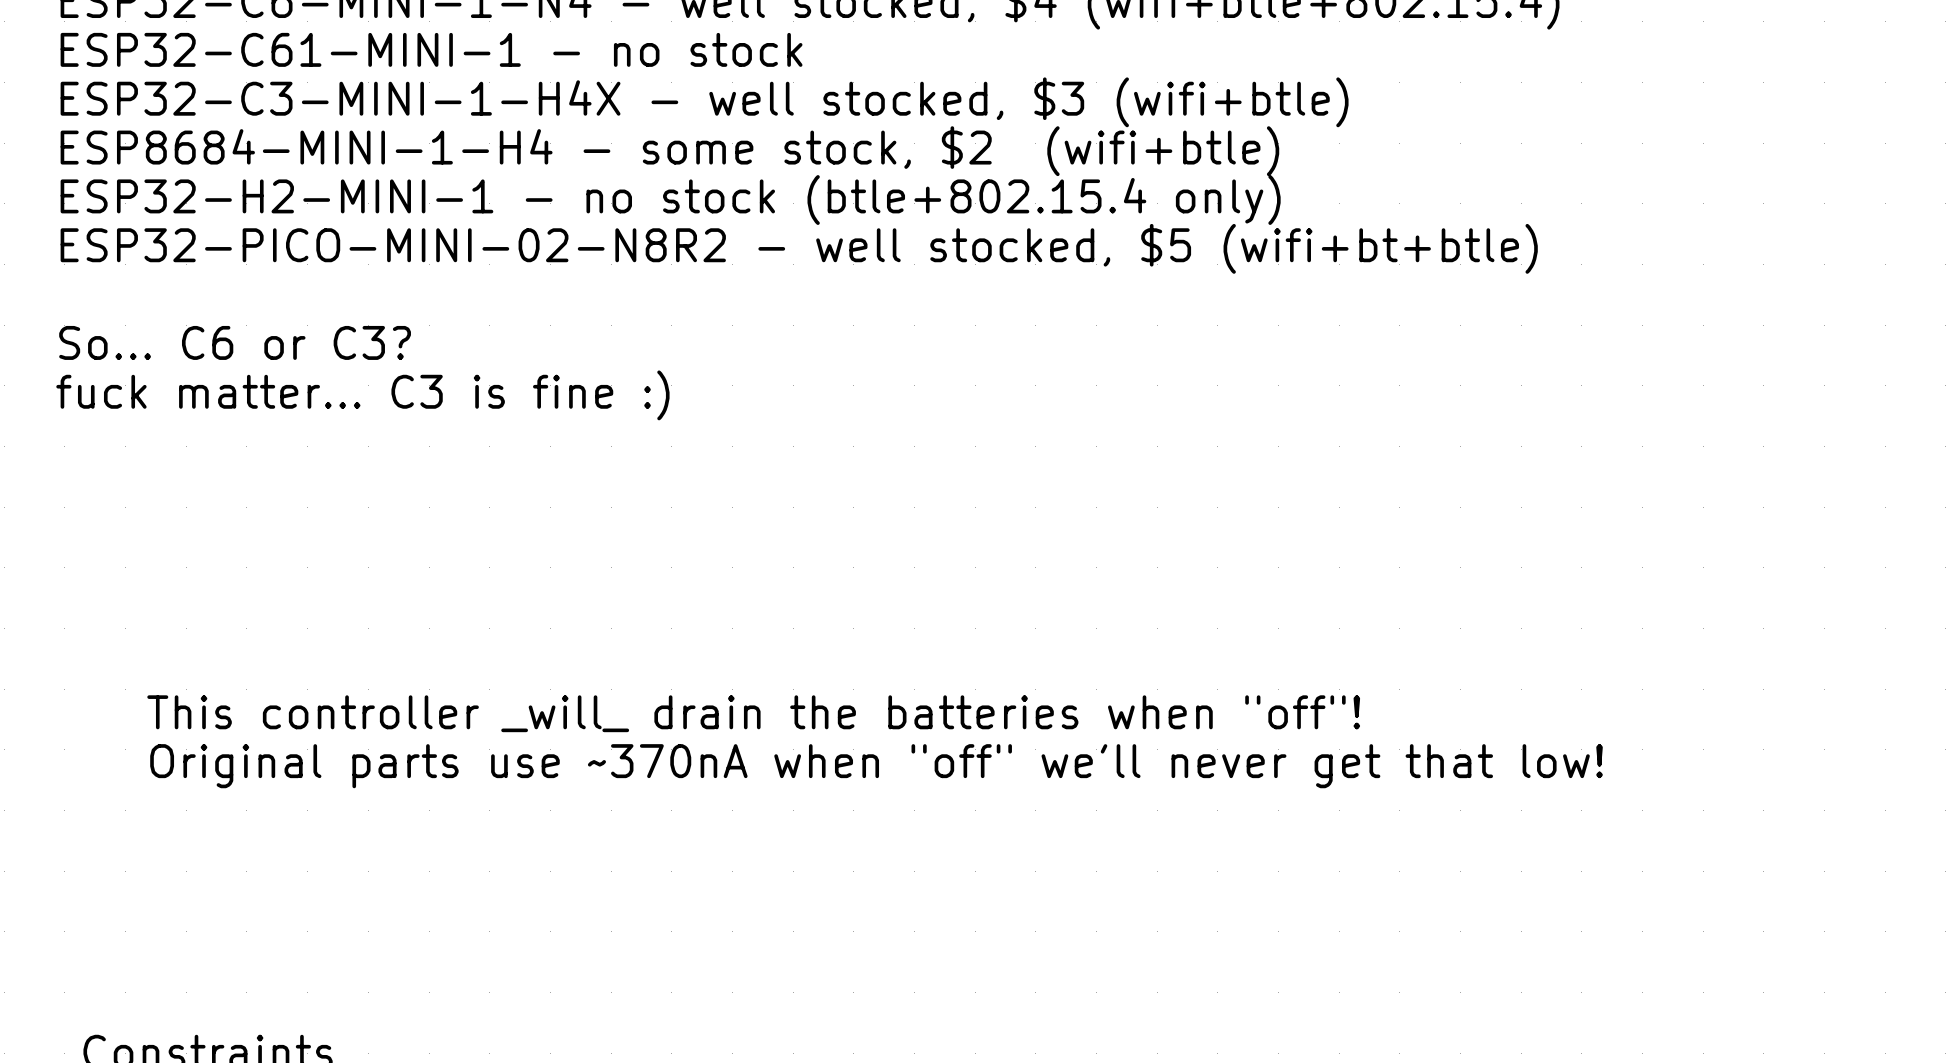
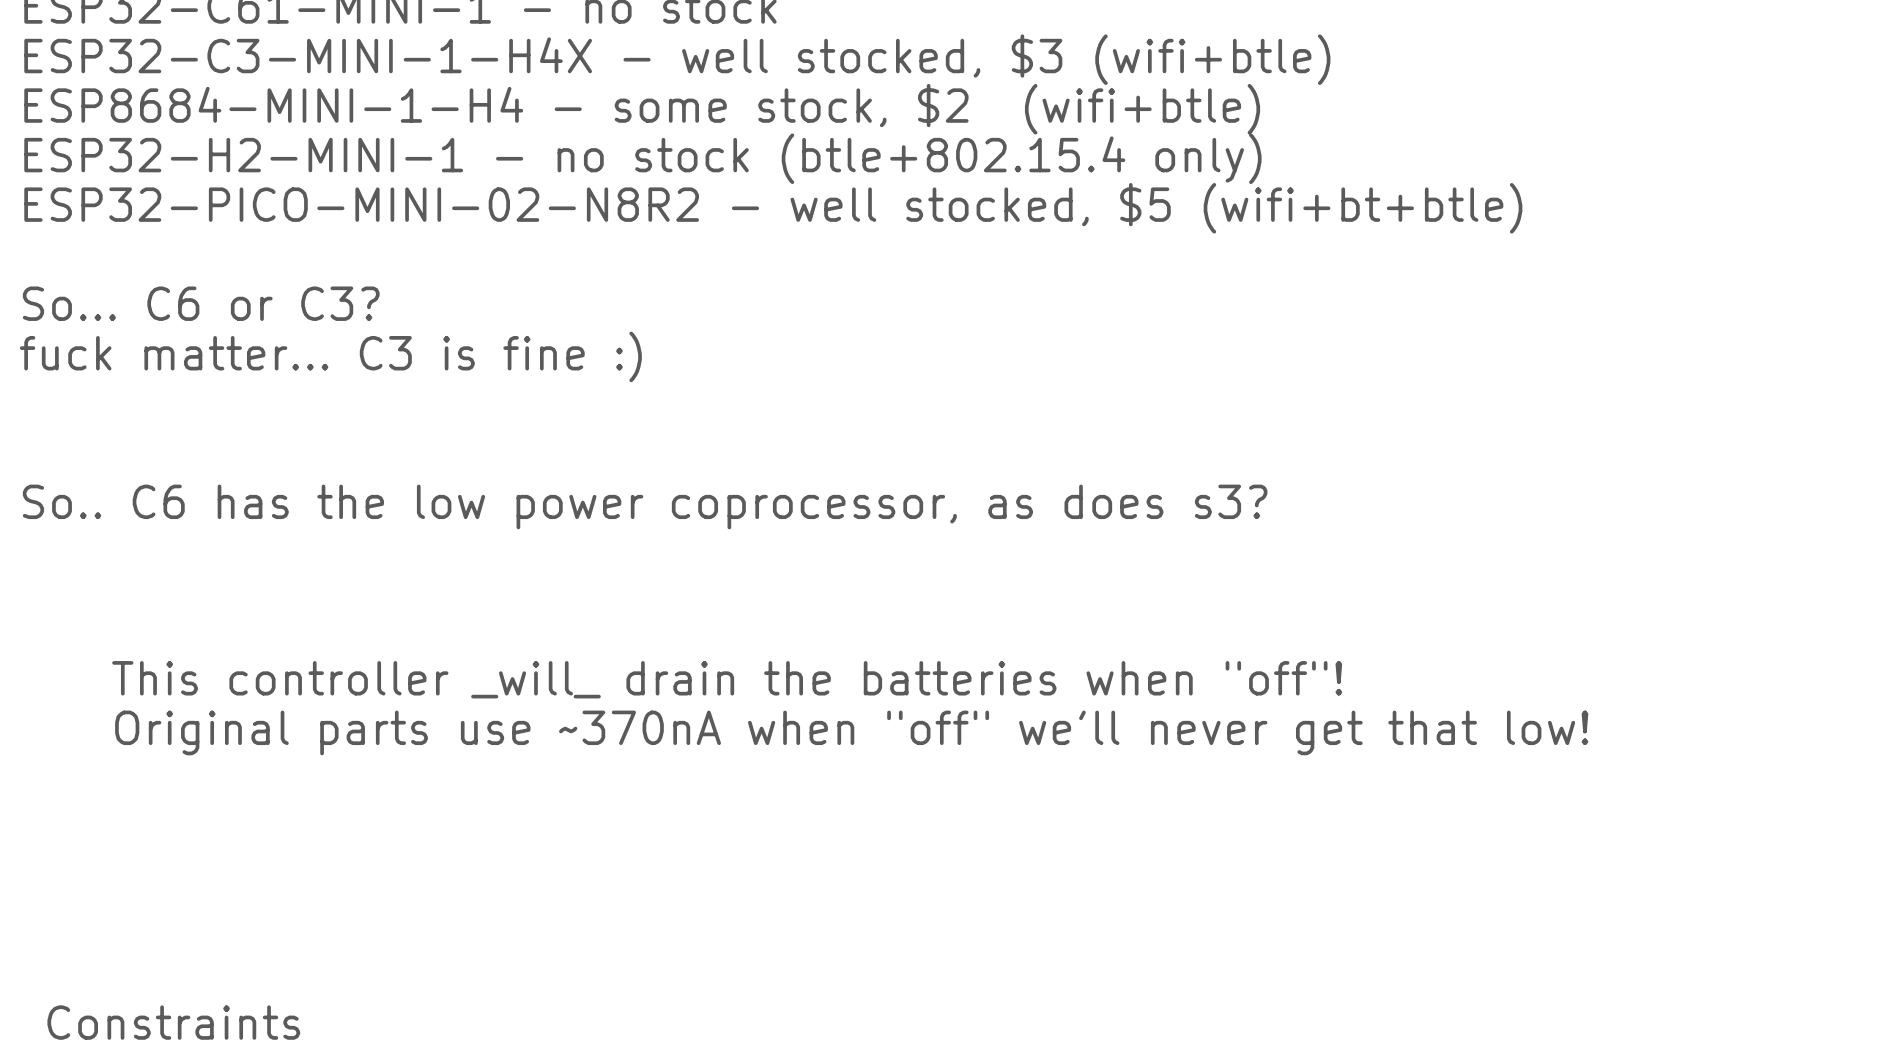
text: none -> So.. C6 has the low power coprocessor, as does s3? (645, 506)

